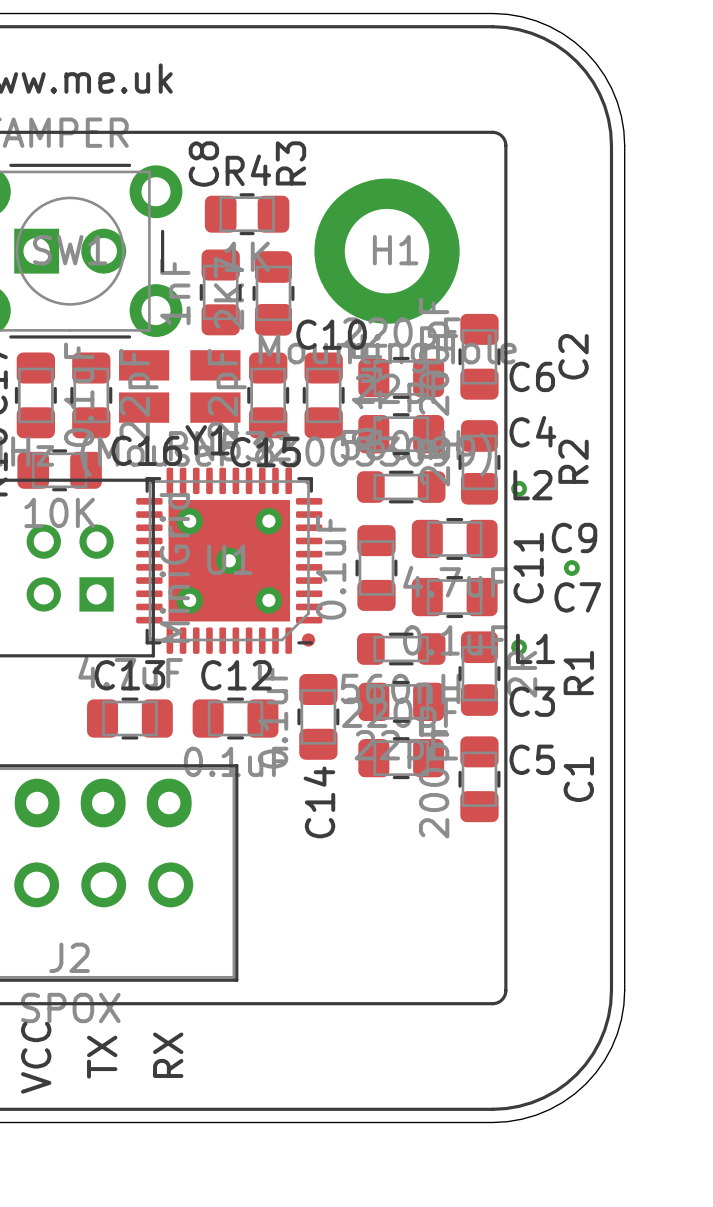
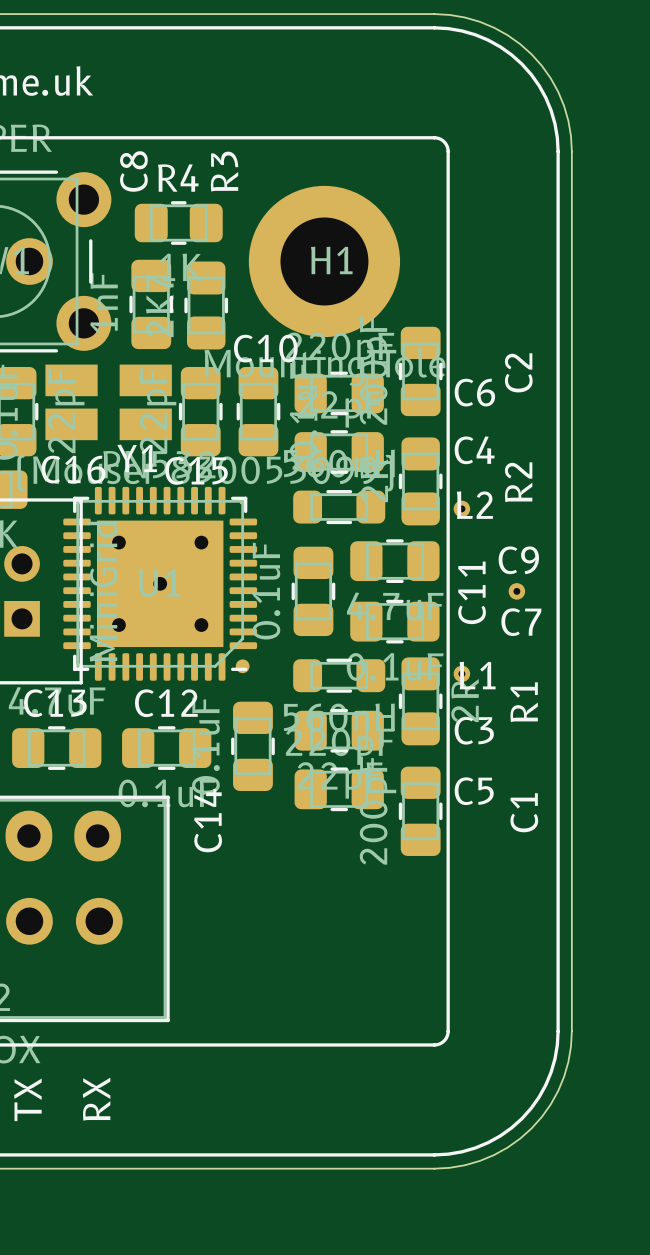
C14 name position: C14 (319, 802) -> C14 (208, 820)

